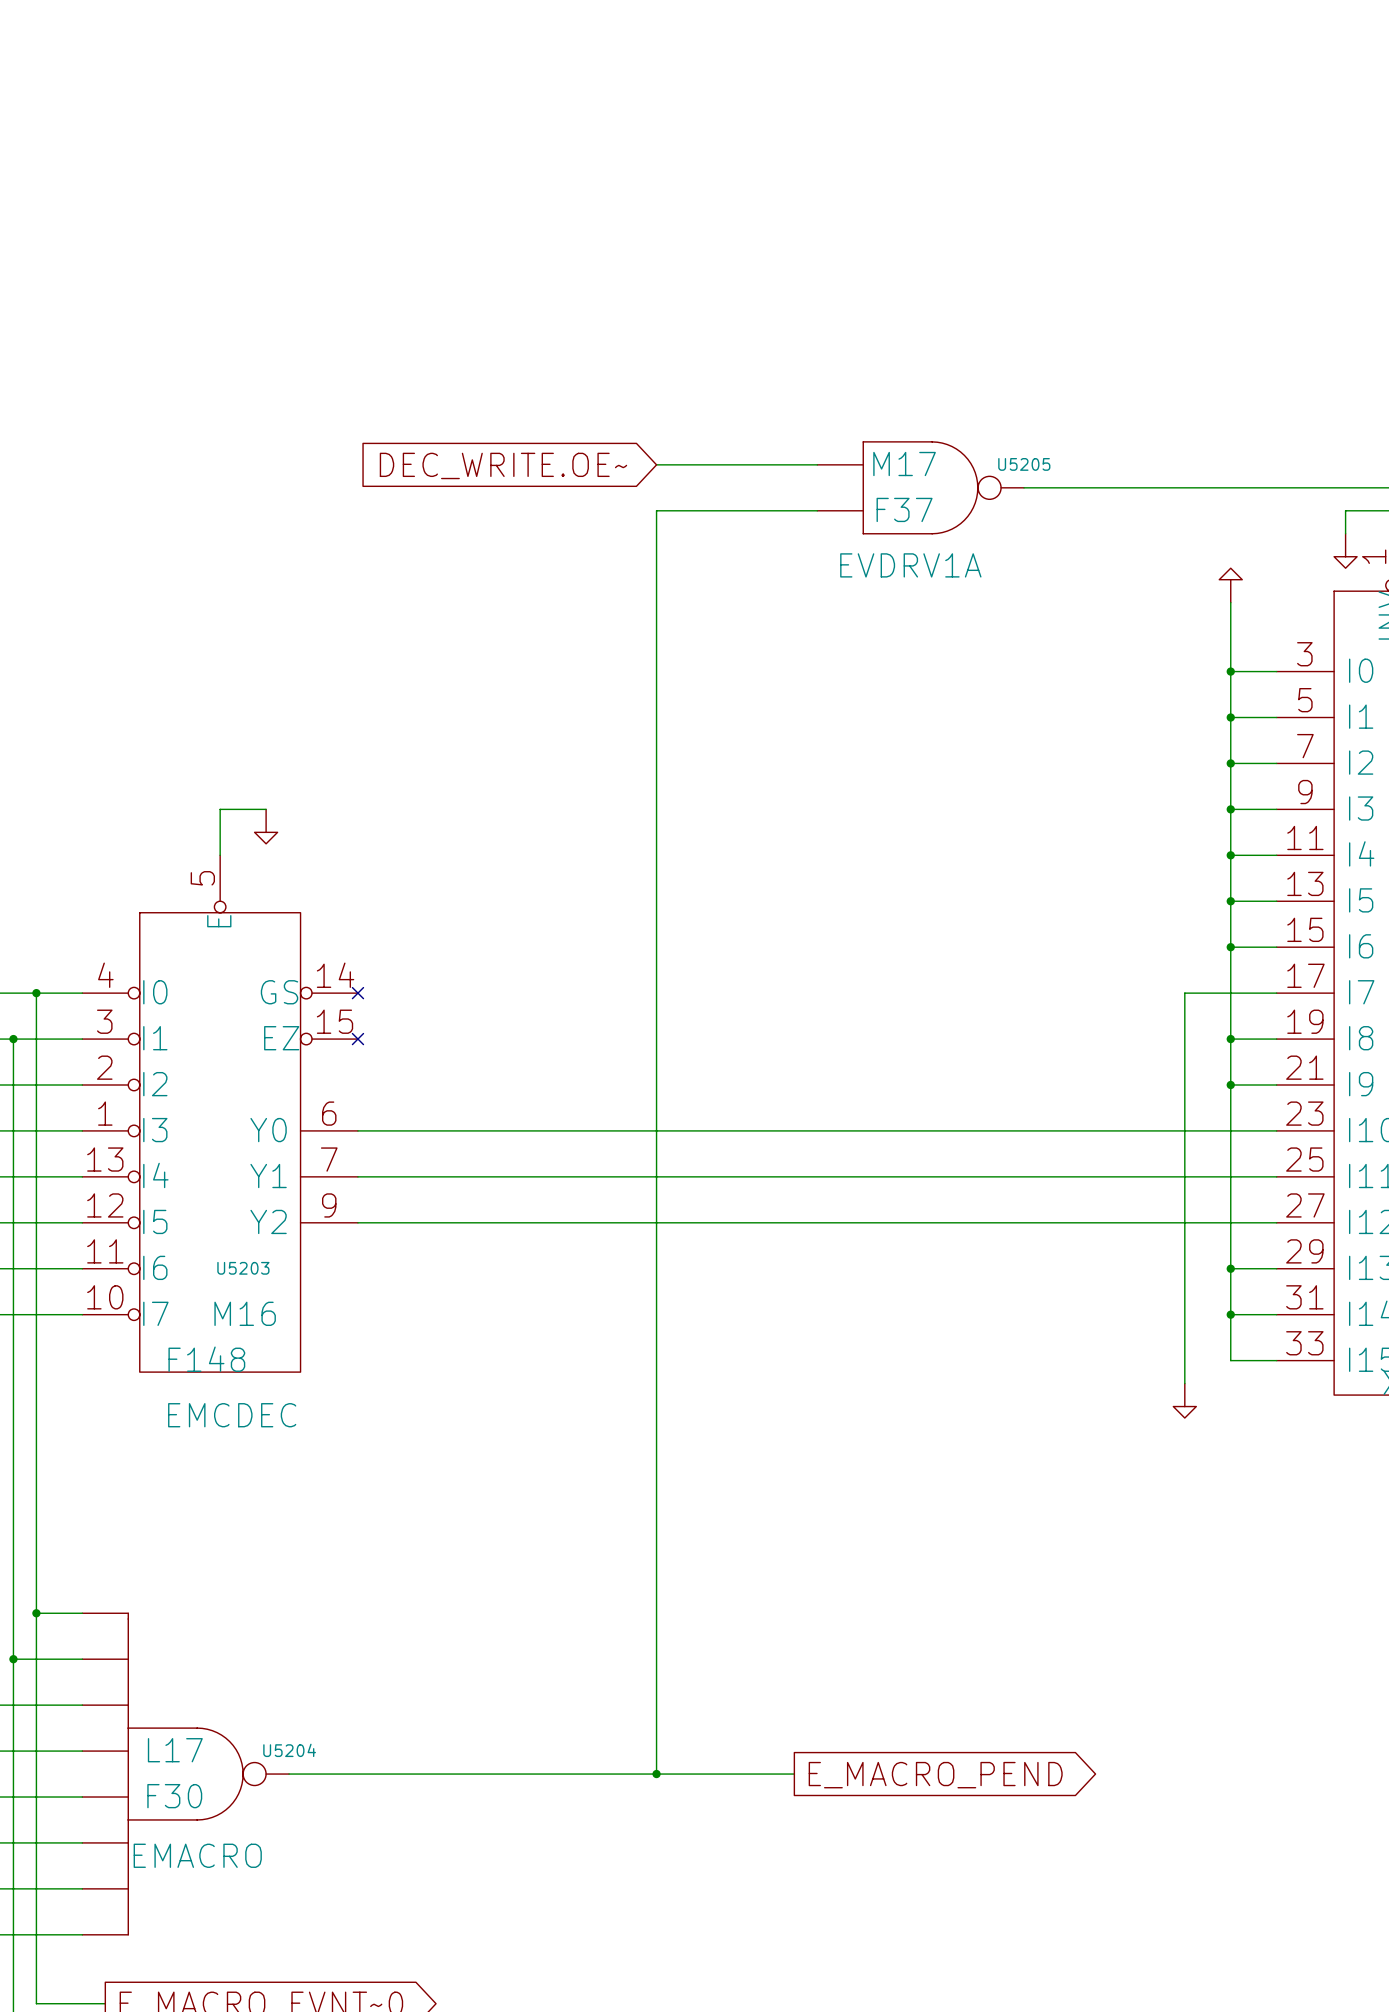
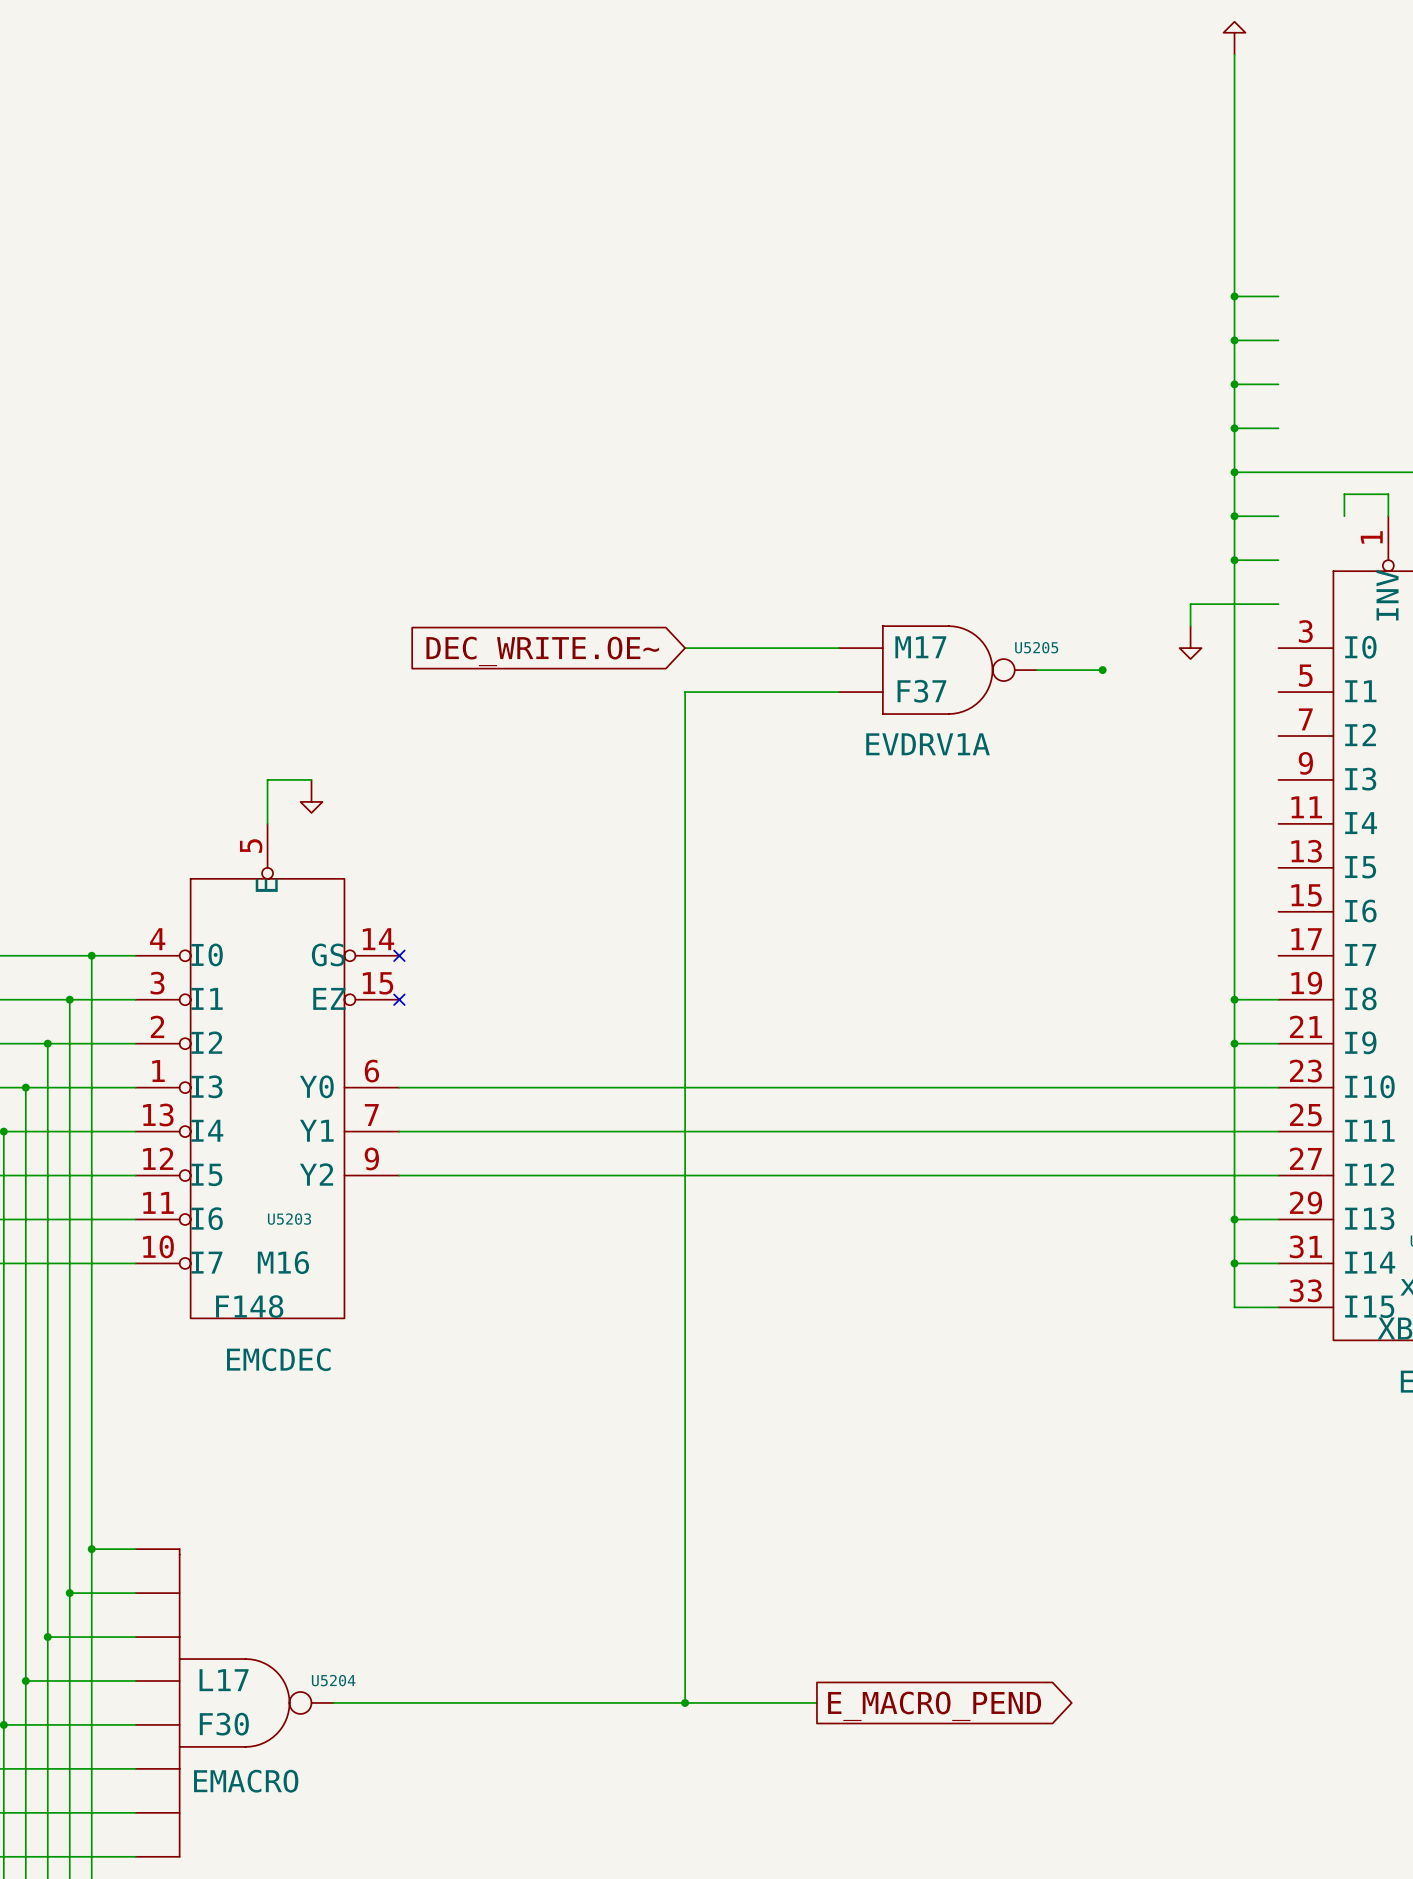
power symbol: none -> (1234, 37)
wire: none -> (1234, 54) (1234, 582)
wire: none -> (1234, 296) (1278, 296)
junction: none -> (1234, 296)
wire: none -> (1234, 340) (1278, 340)
junction: none -> (1234, 340)
wire: none -> (1234, 384) (1278, 384)
junction: none -> (1234, 384)
wire: none -> (1234, 428) (1278, 428)
junction: none -> (1234, 428)
wire: (656, 464) (817, 464) -> (685, 648) (838, 648)
global label position: DEC_WRITE.OE~ (503, 465) -> DEC_WRITE.OE~ (542, 651)
U5205 position: (920, 487) -> (937, 670)
wire: (1024, 487) (1230, 487) -> none
junction: none -> (1234, 472)
wire: (817, 510) (656, 510) (656, 717) -> (838, 692) (685, 692)
junction: none -> (1234, 516)
power symbol: (1345, 551) -> none
power symbol rotation: 0° (1230, 573) -> 180° (1190, 653)
junction: none -> (1234, 560)
power symbol position: (1230, 585) -> (1190, 642)
wire: none -> (1278, 604) (1190, 604) (1190, 626)
wire: (1230, 671) (1276, 671) -> (1234, 516) (1278, 516)
junction: (1230, 671) -> none
wire: none -> (1036, 670) (1102, 670)
junction: none -> (1102, 670)
wire: (1230, 717) (1276, 717) -> (1234, 560) (1278, 560)
junction: (1230, 717) -> none
wire: (1230, 763) (1276, 763) -> none
junction: (1230, 763) -> none
wire: (1230, 809) (1276, 809) -> none
junction: (1230, 809) -> none
wire: (1230, 855) (1276, 855) -> none
junction: (1230, 855) -> none
wire: (1230, 901) (1276, 901) -> none
junction: (1230, 901) -> none
wire: (1230, 947) (1276, 947) -> none
junction: (1230, 947) -> none
wire: (1276, 993) (1184, 993) (1184, 1383) -> none
power symbol: (1184, 1401) -> none

